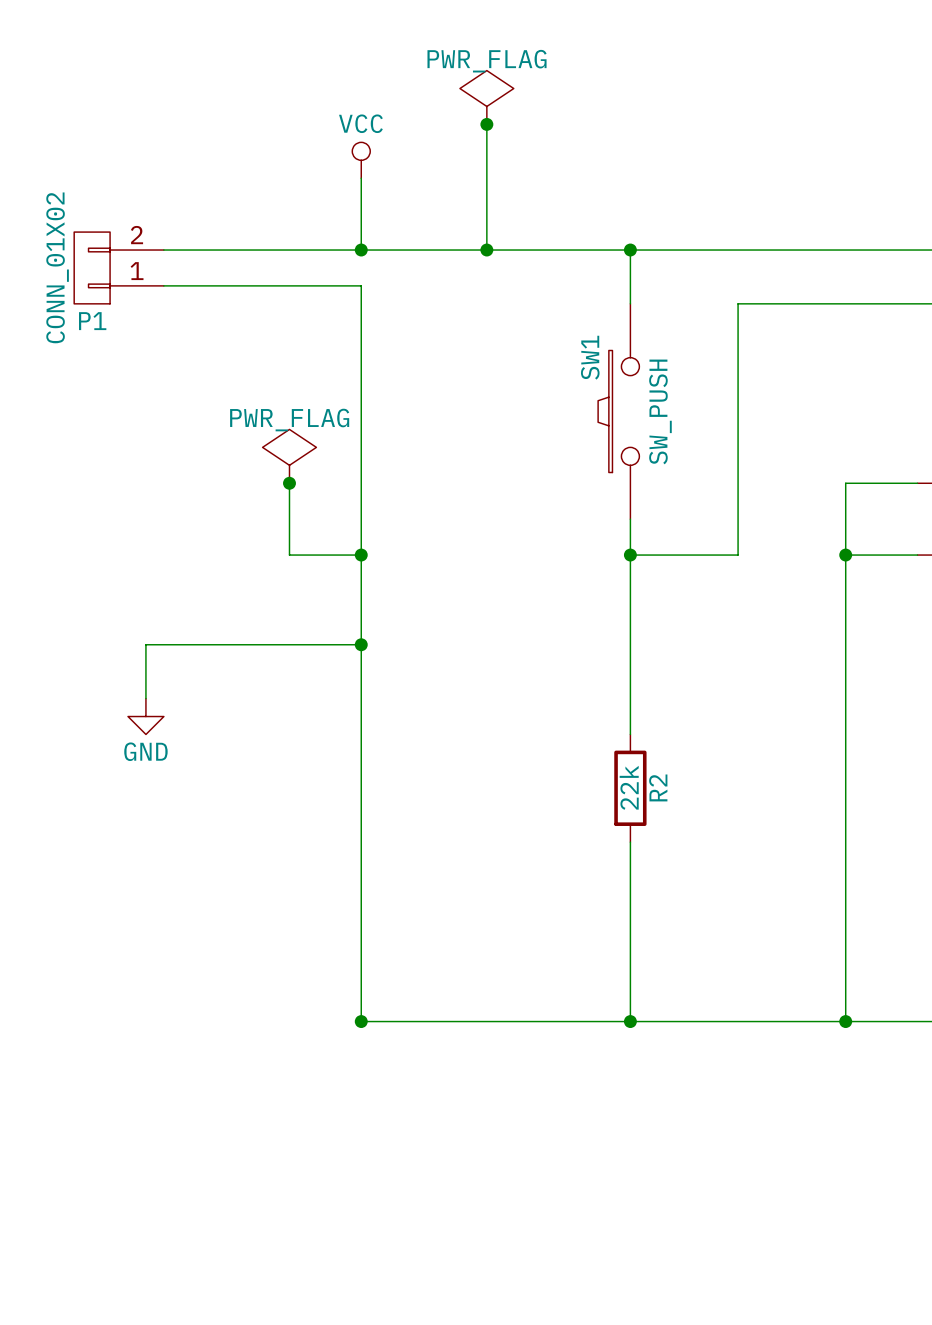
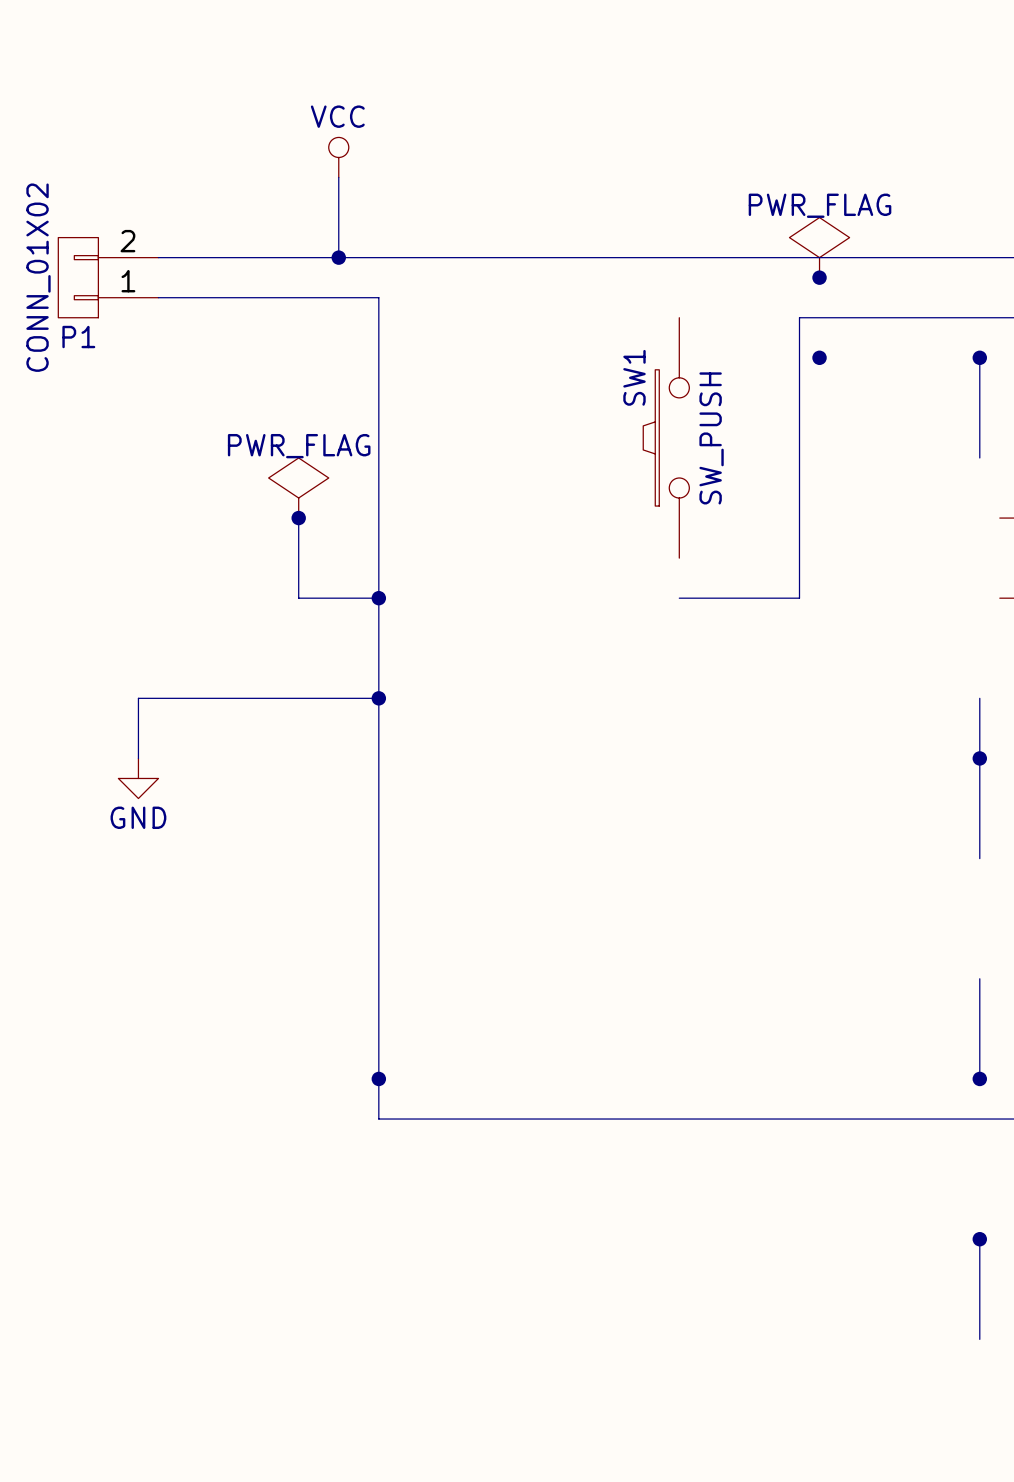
power symbol position: PWR_FLAG (486, 97) -> PWR_FLAG (819, 247)
wire: (486, 124) (486, 250) -> none
junction: (486, 124) -> none
power symbol position: VCC (361, 160) -> VCC (338, 157)
wire: (361, 178) (361, 250) -> (338, 177) (338, 257)
junction position: (361, 250) -> (338, 257)
junction: (486, 250) -> none
wire: (630, 250) (630, 303) -> none
junction: (630, 250) -> none
junction: none -> (819, 277)
junction: none -> (819, 357)
wire: none -> (979, 357) (979, 457)
junction: none -> (979, 357)
wire: (917, 483) (845, 483) (845, 1021) -> none
wire: (630, 519) (630, 734) -> none
junction: (630, 555) -> none
wire: (845, 555) (917, 555) -> none
junction: (845, 555) -> none
wire: none -> (979, 698) (979, 858)
junction: none -> (979, 758)
R2: 22k (630, 788) -> none
wire: (630, 842) (630, 1021) -> none
wire: none -> (979, 978) (979, 1078)
junction: none -> (979, 1078)
junction position: (361, 1021) -> (378, 1078)
junction: (630, 1021) -> none
junction: (845, 1021) -> none
wire: none -> (979, 1239) (979, 1339)
junction: none -> (979, 1239)

